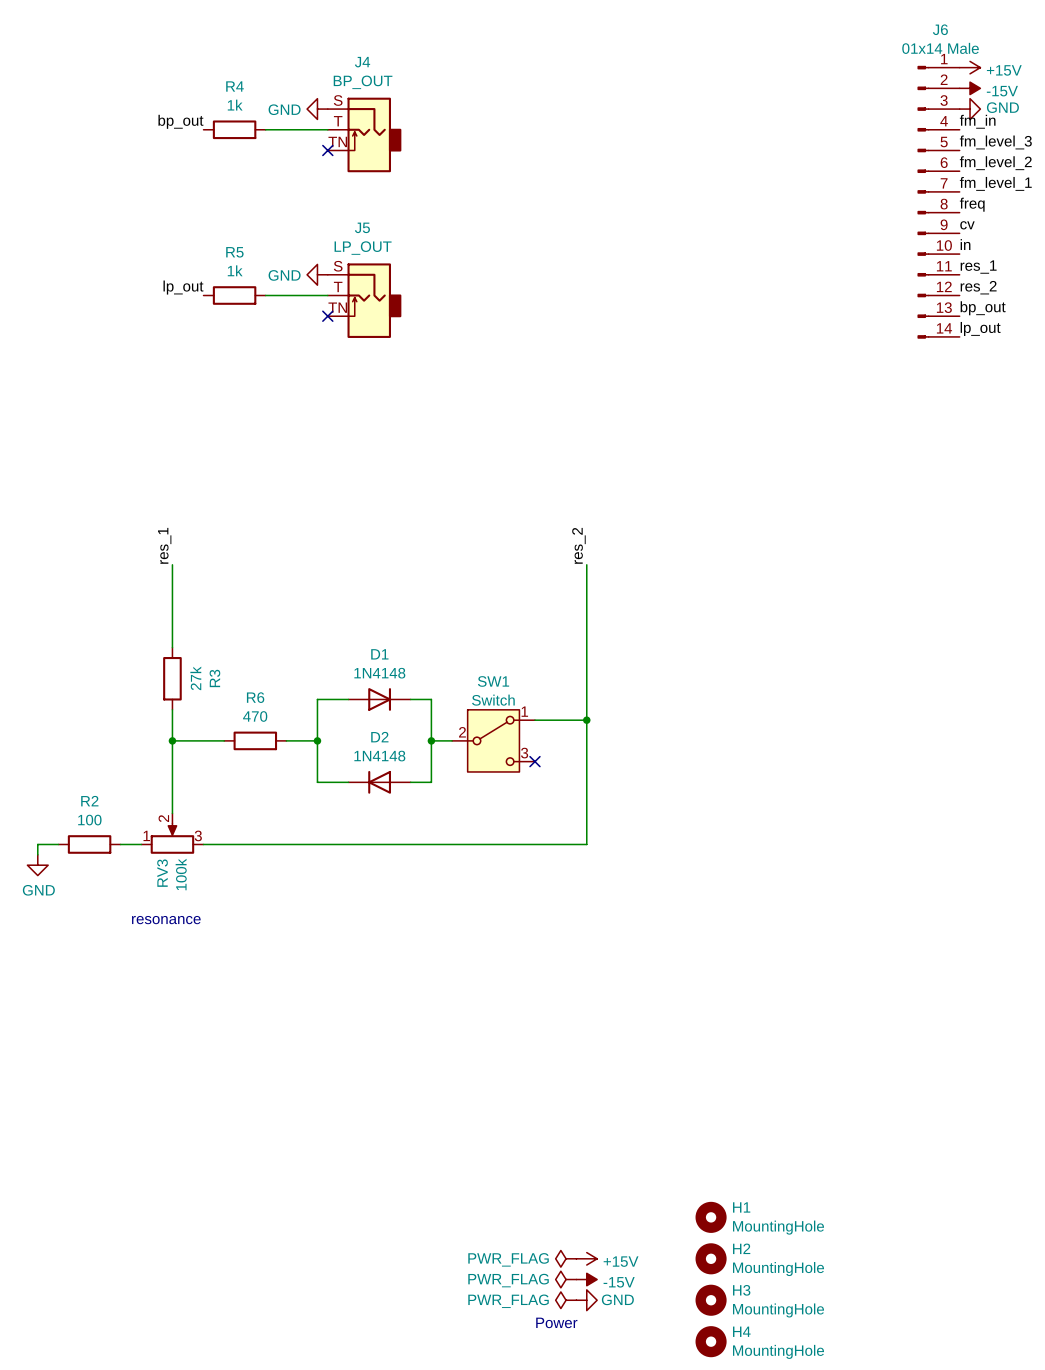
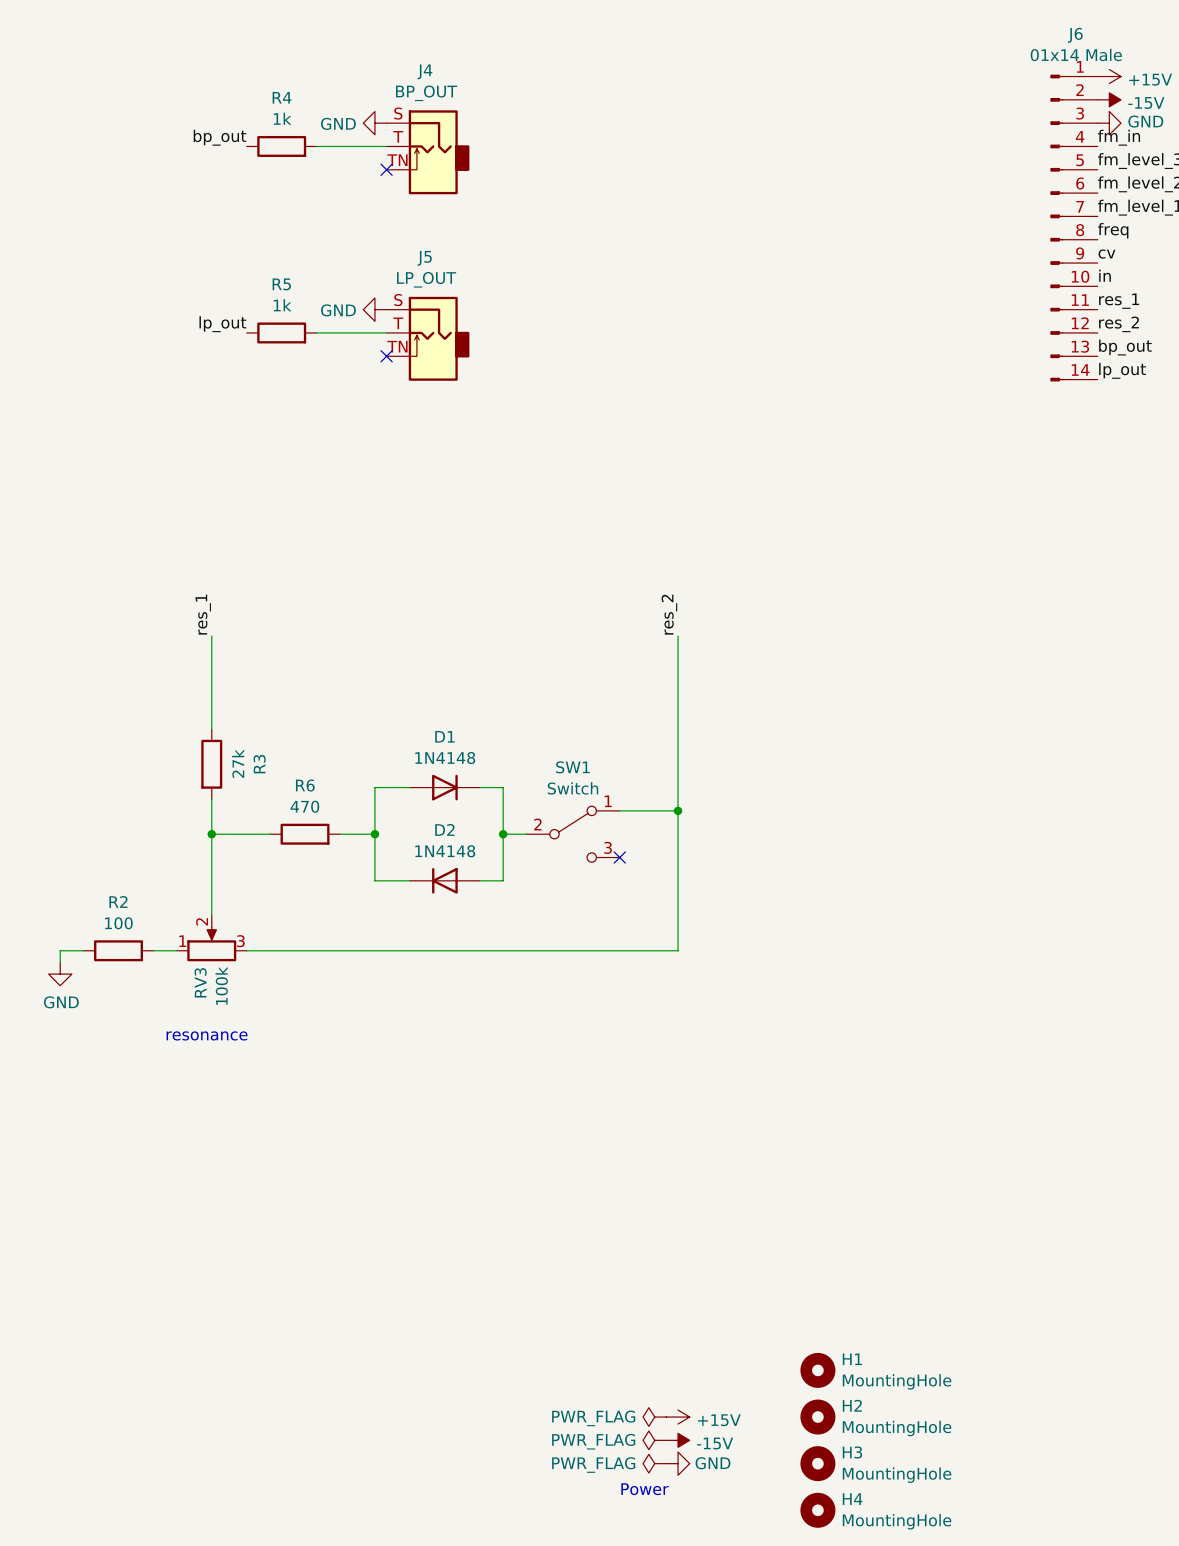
SW1 symbol: [452, 709, 535, 772] -> [526, 806, 620, 863]

